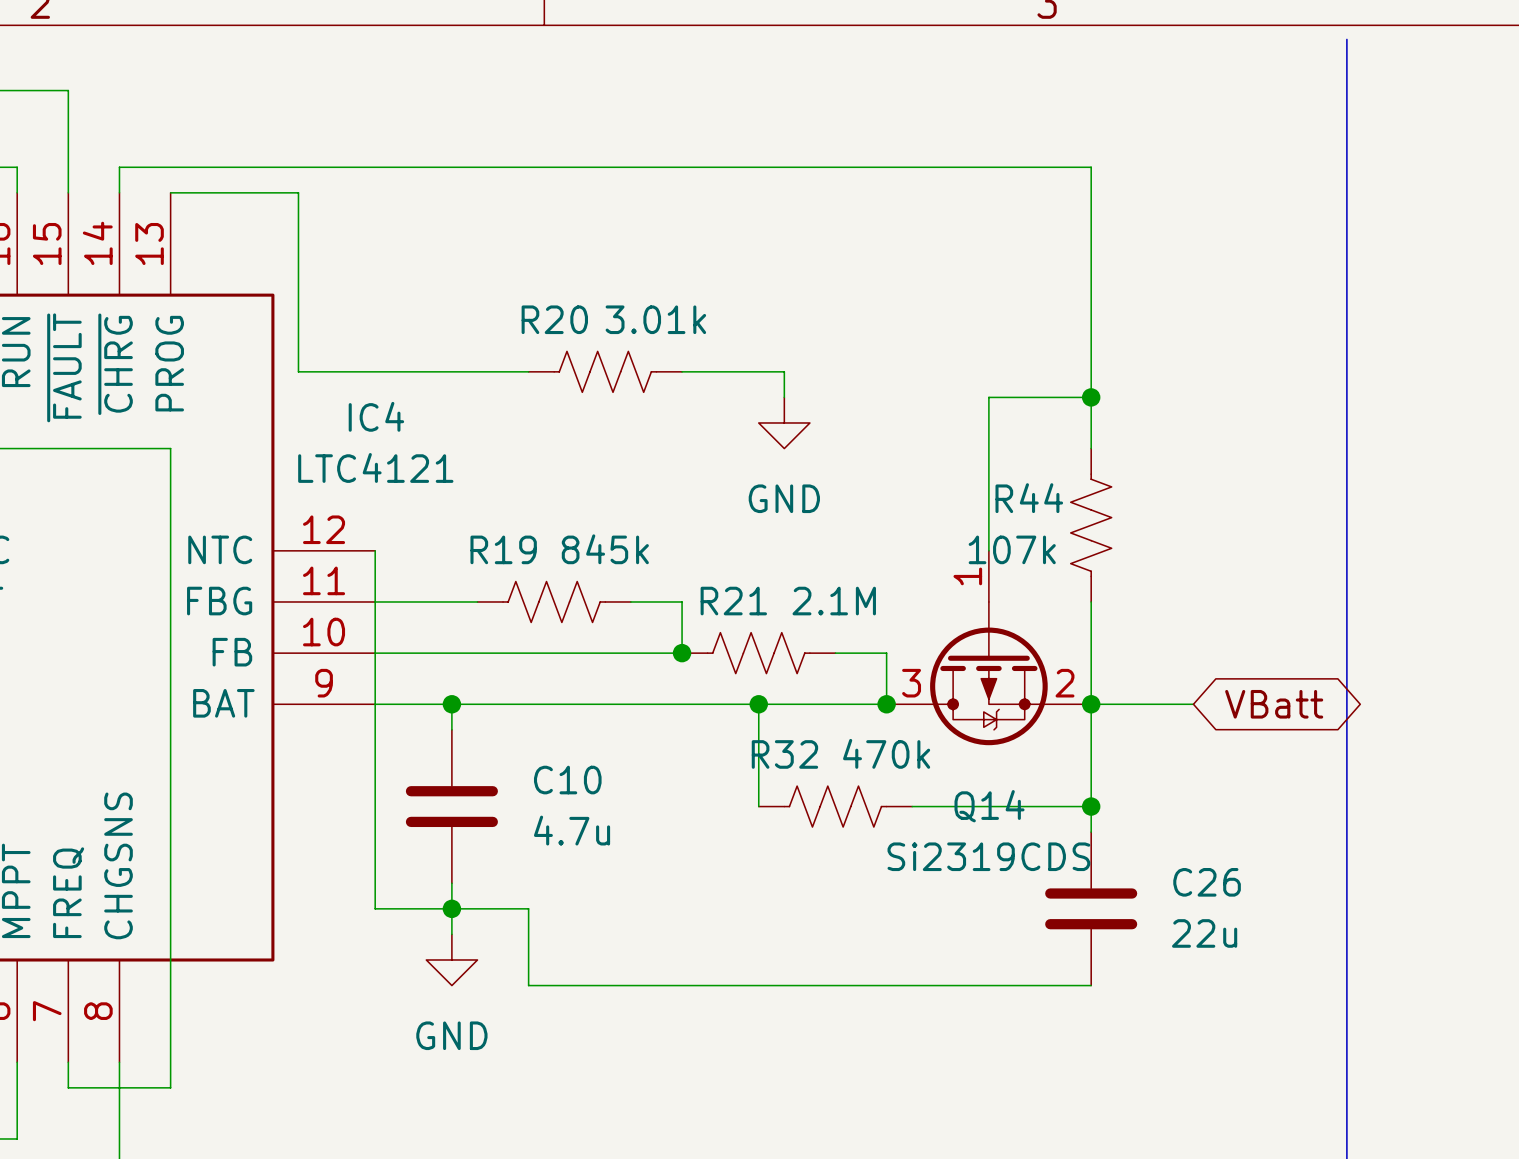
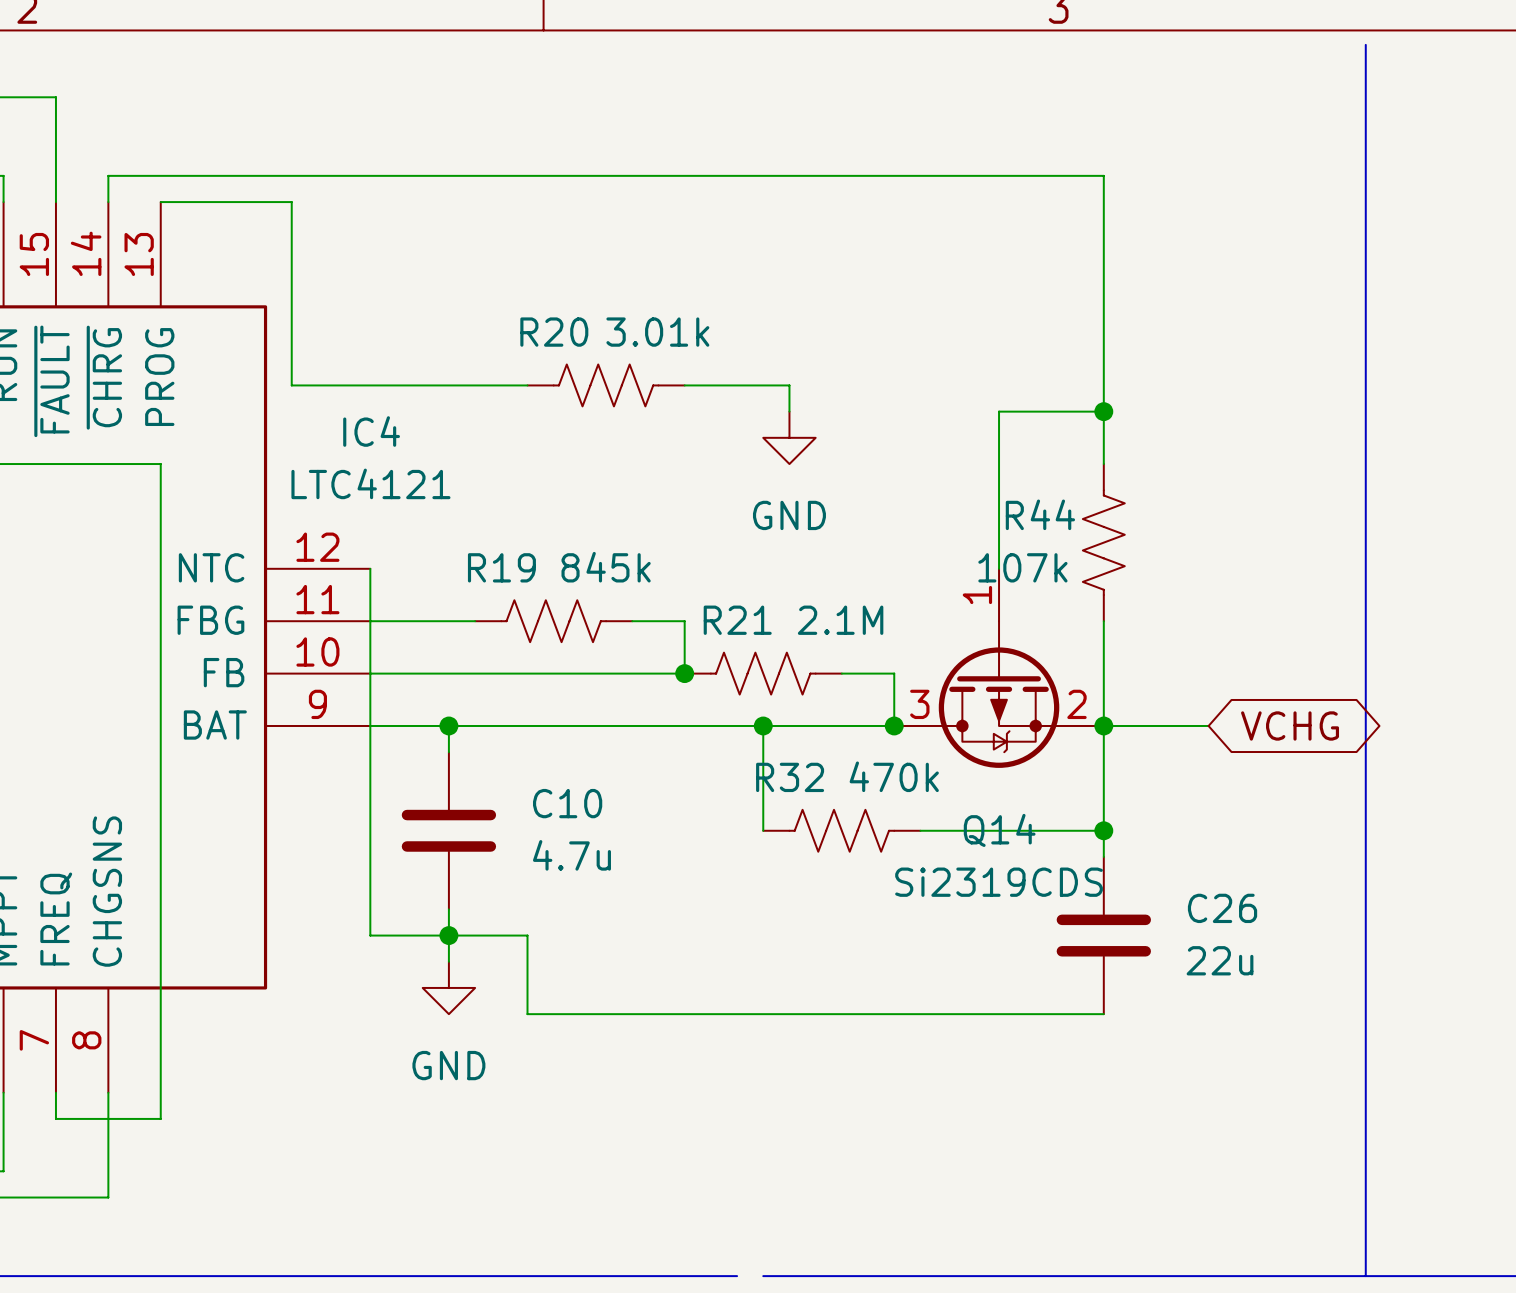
global label: VBatt (1274, 704) -> VCHG (1290, 725)

